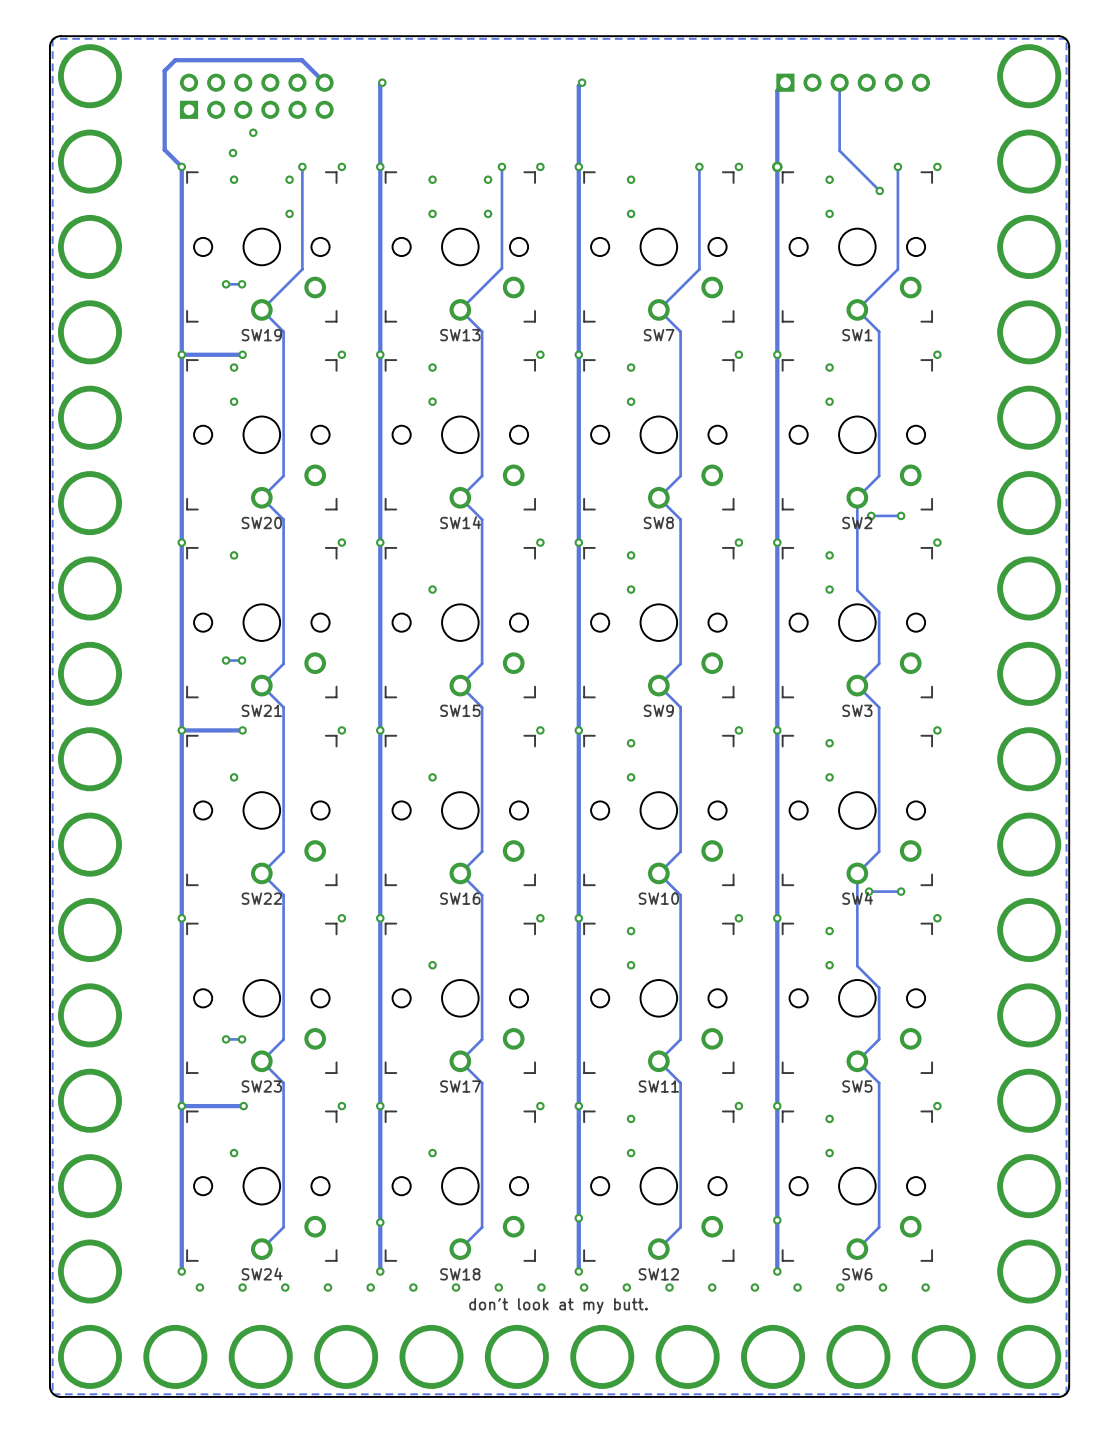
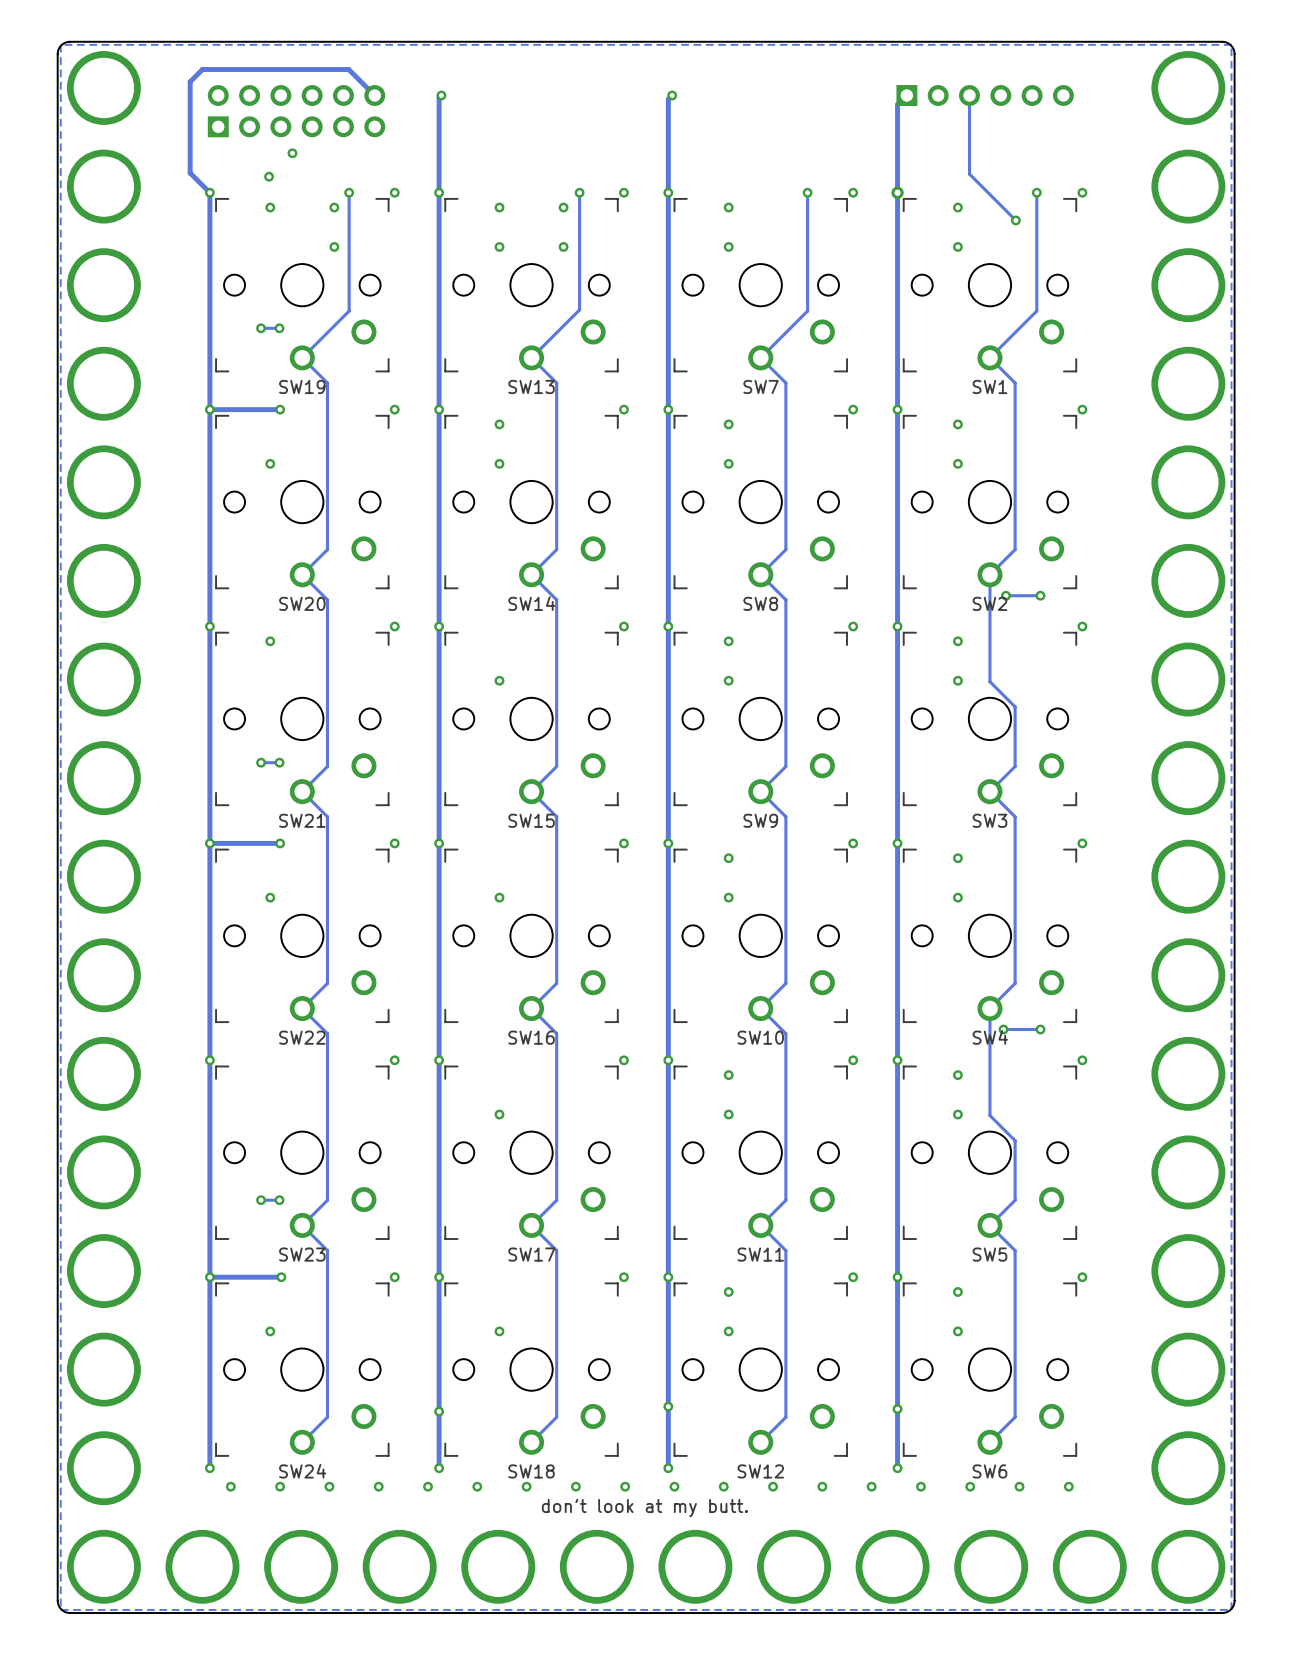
via: (234, 367) -> none

